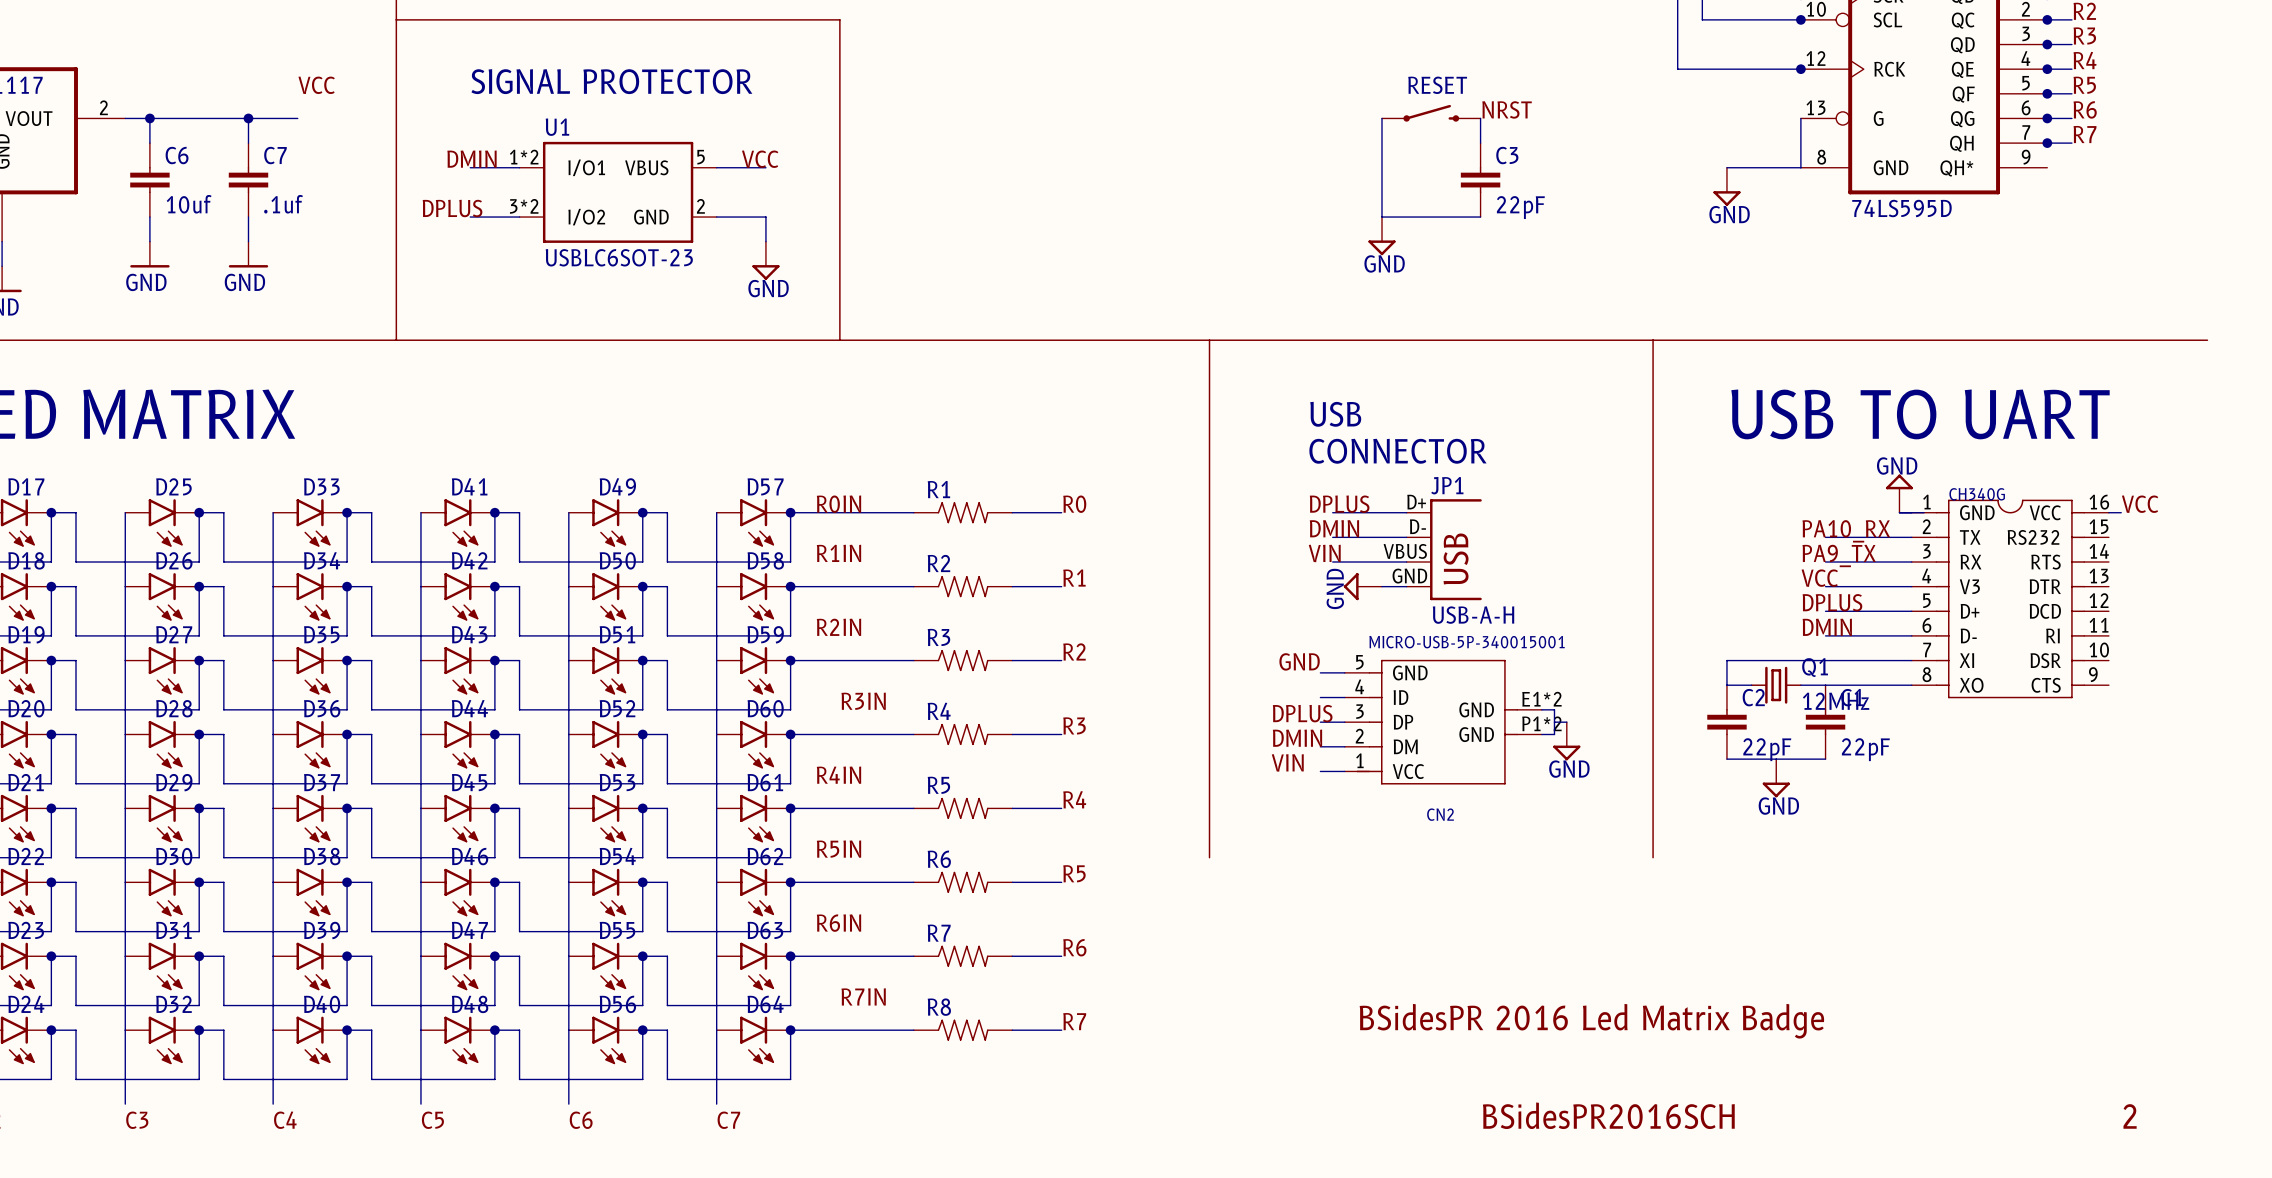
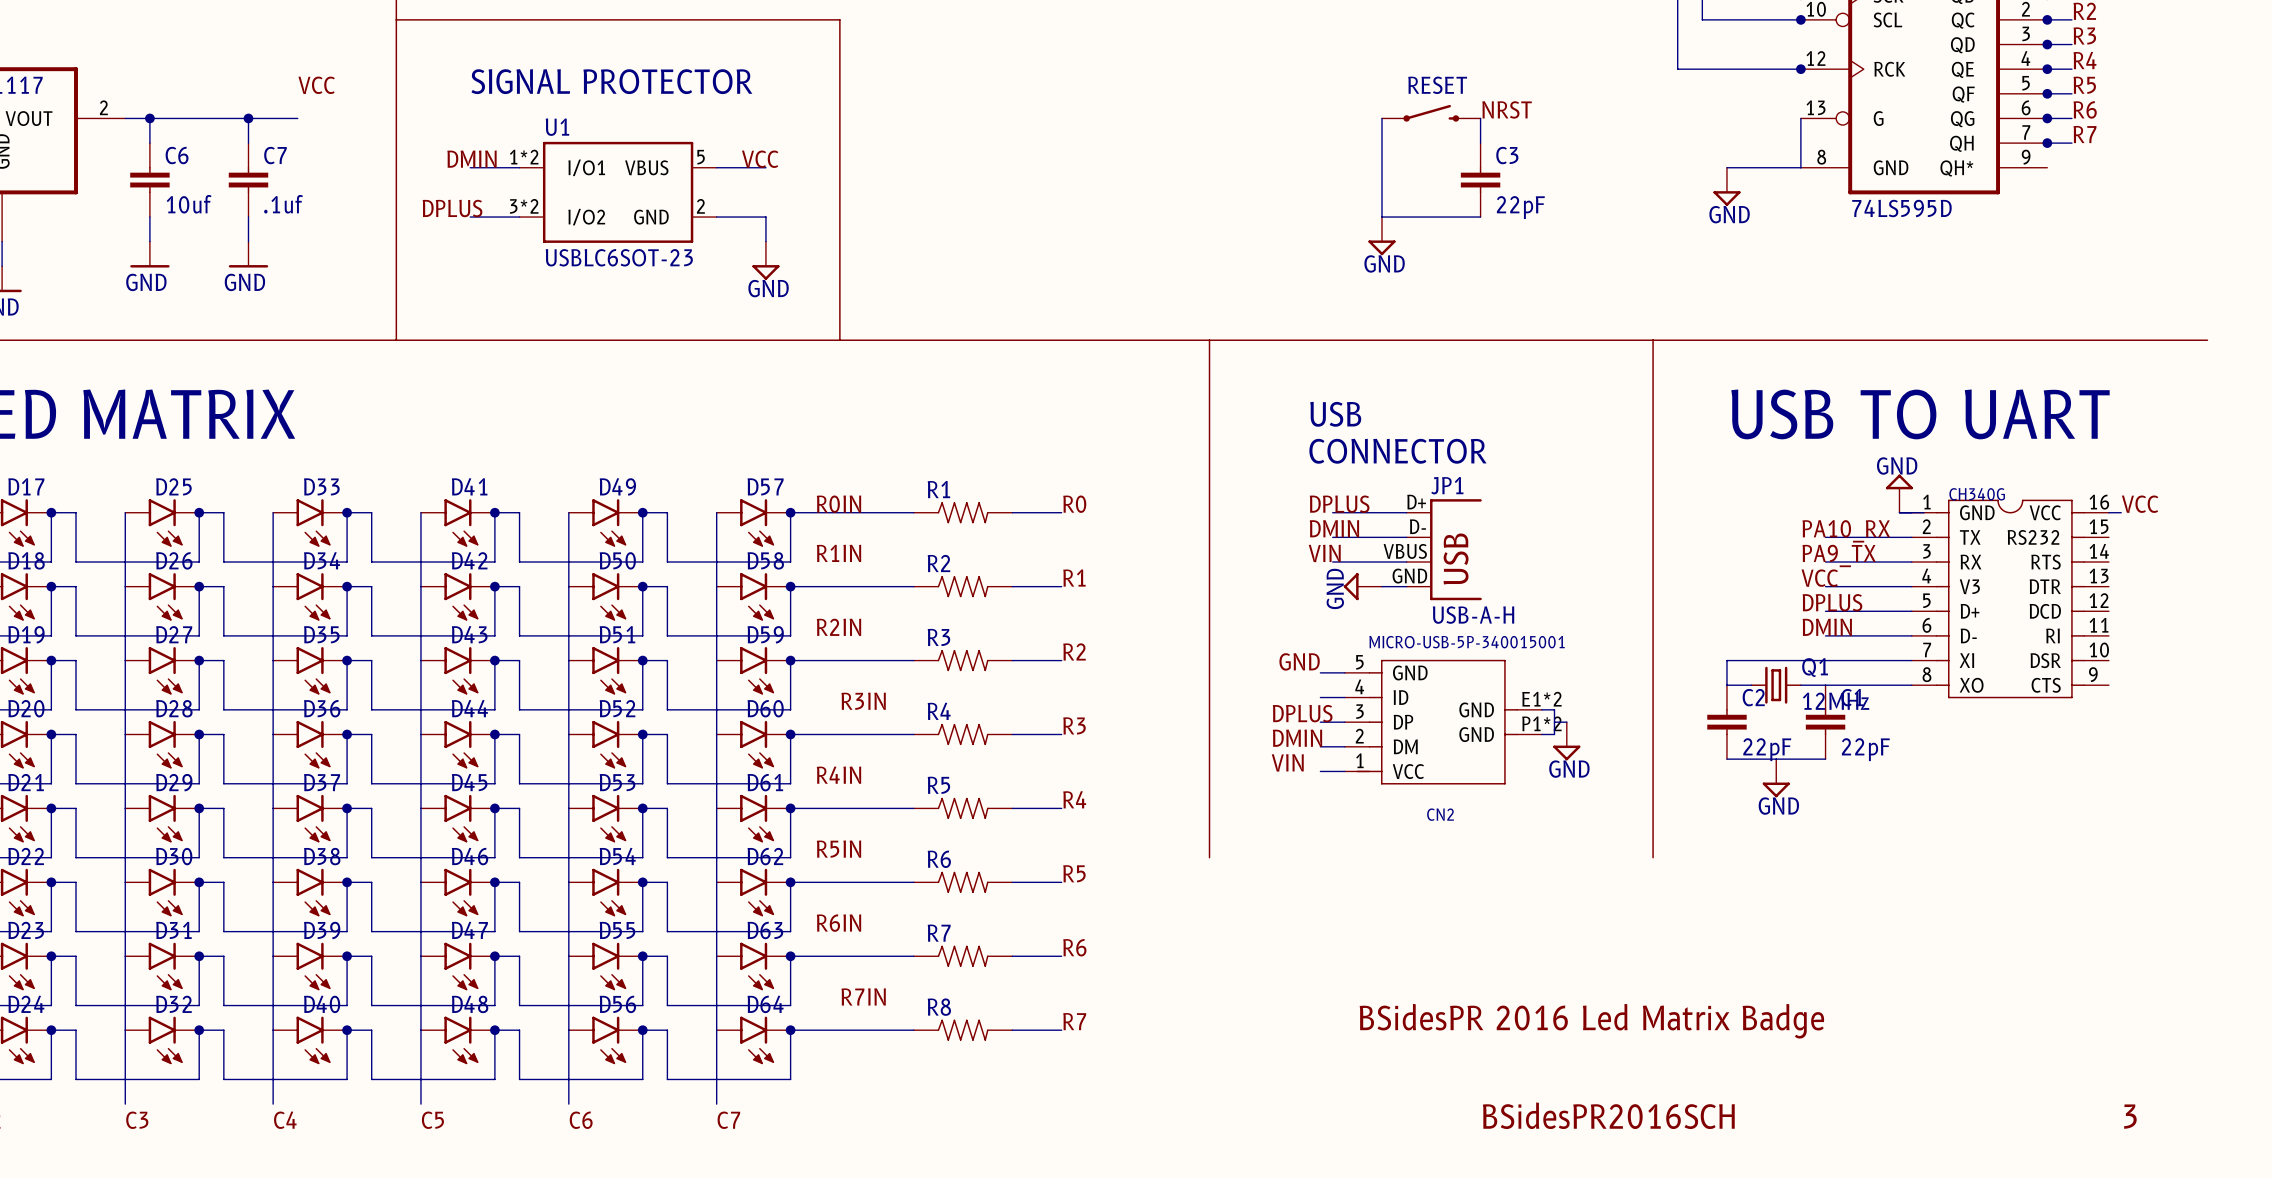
text: 2 (2130, 1116) -> 3 (2130, 1116)

